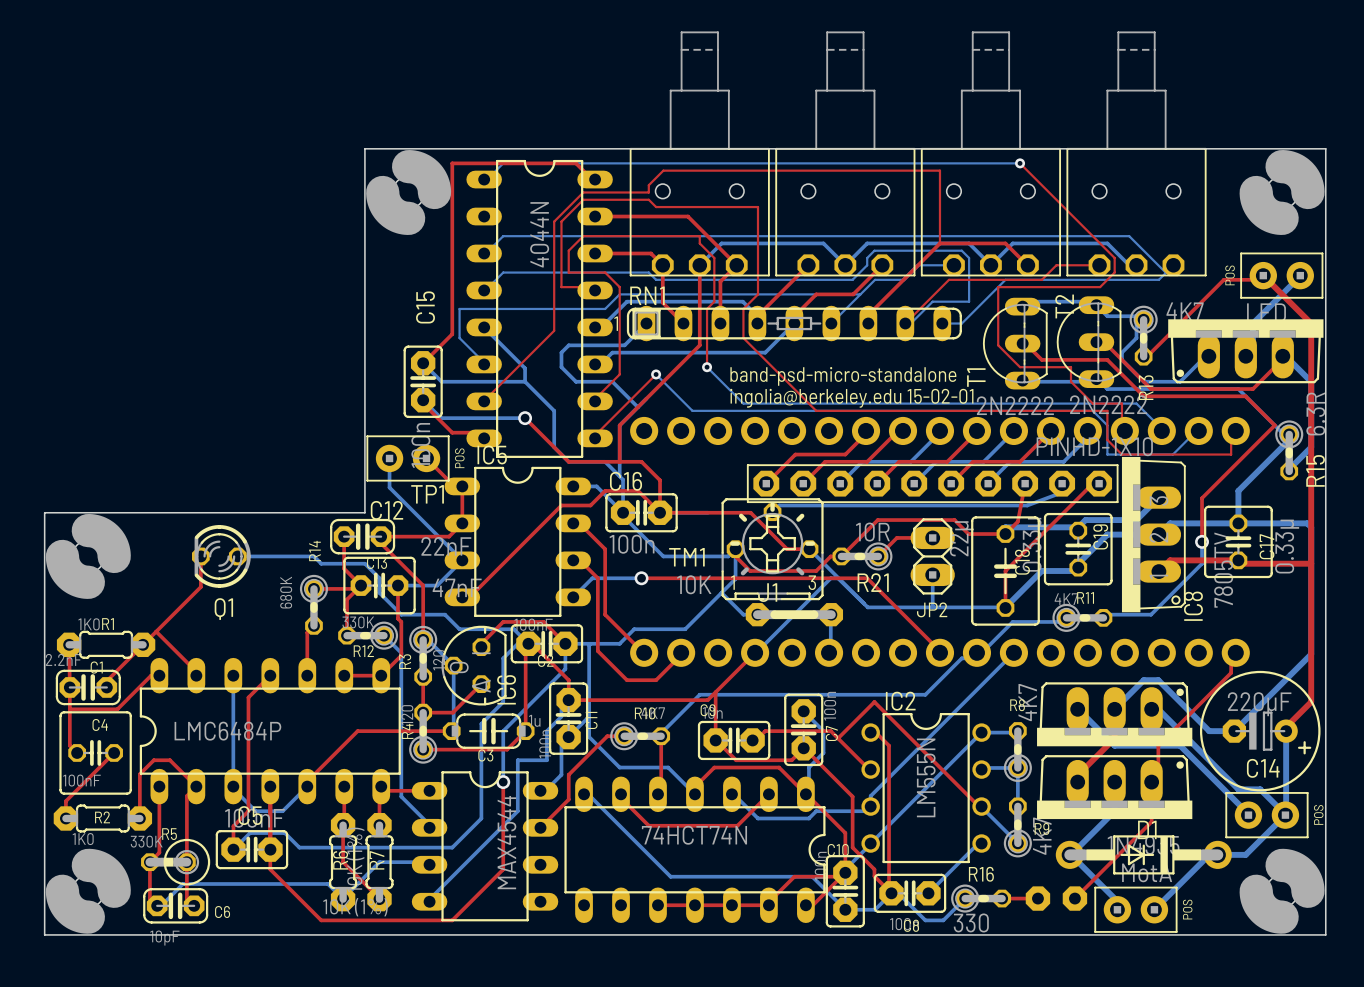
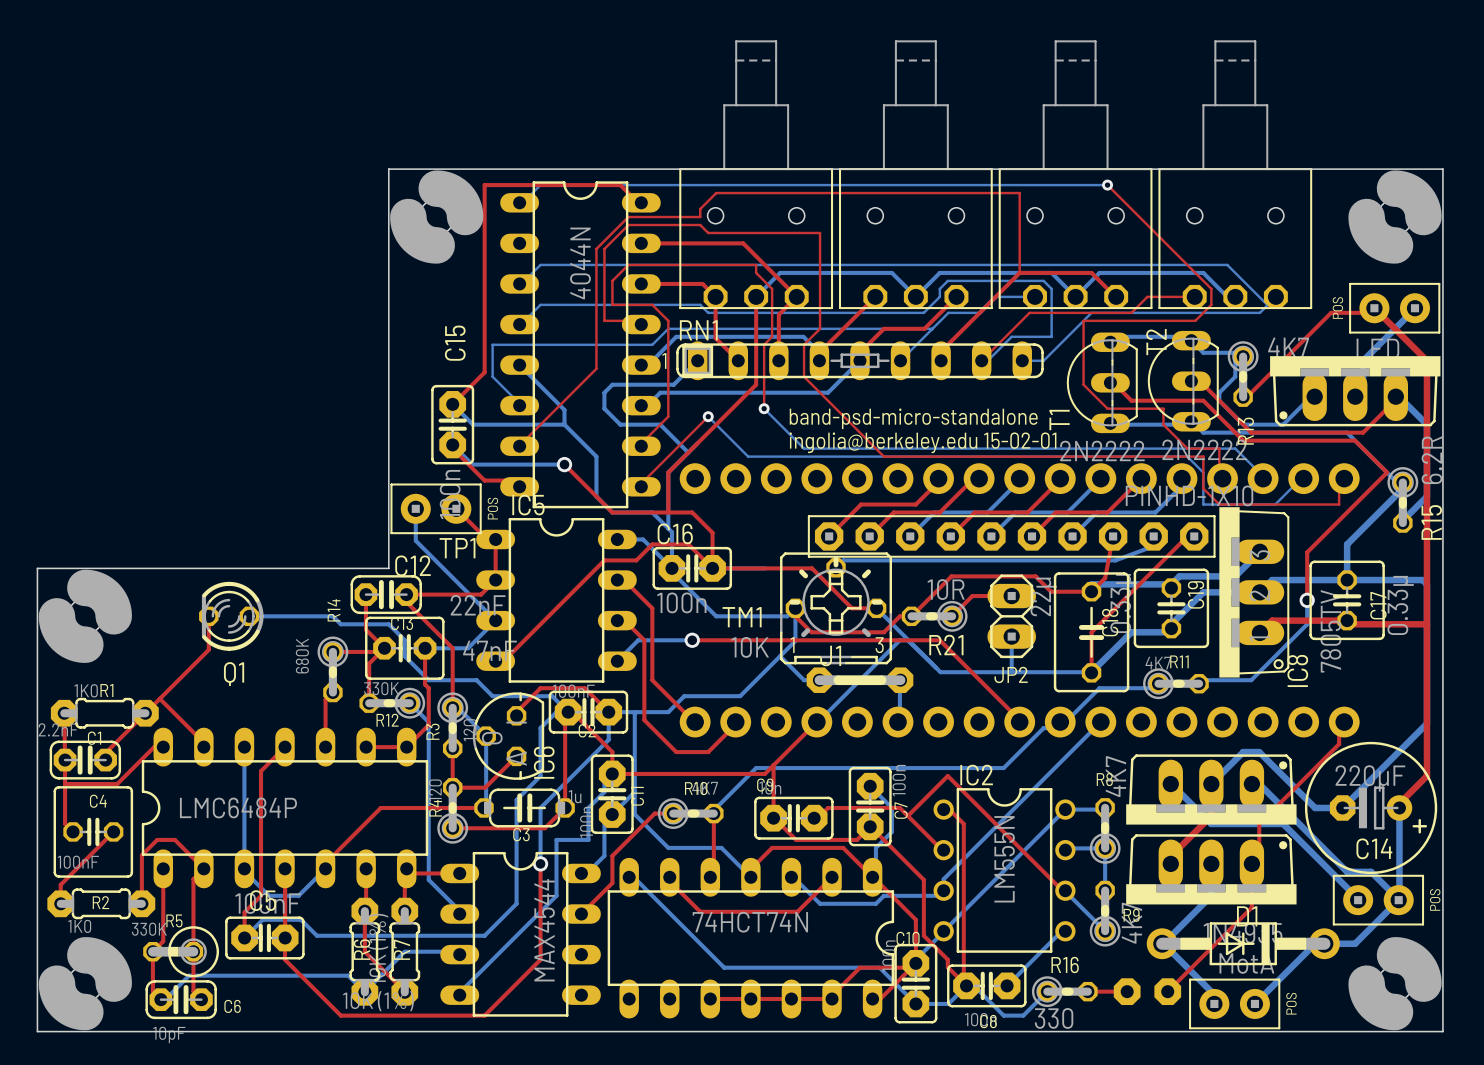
R15 value: 6.3R (1315, 413) -> 6.2R (1431, 460)

